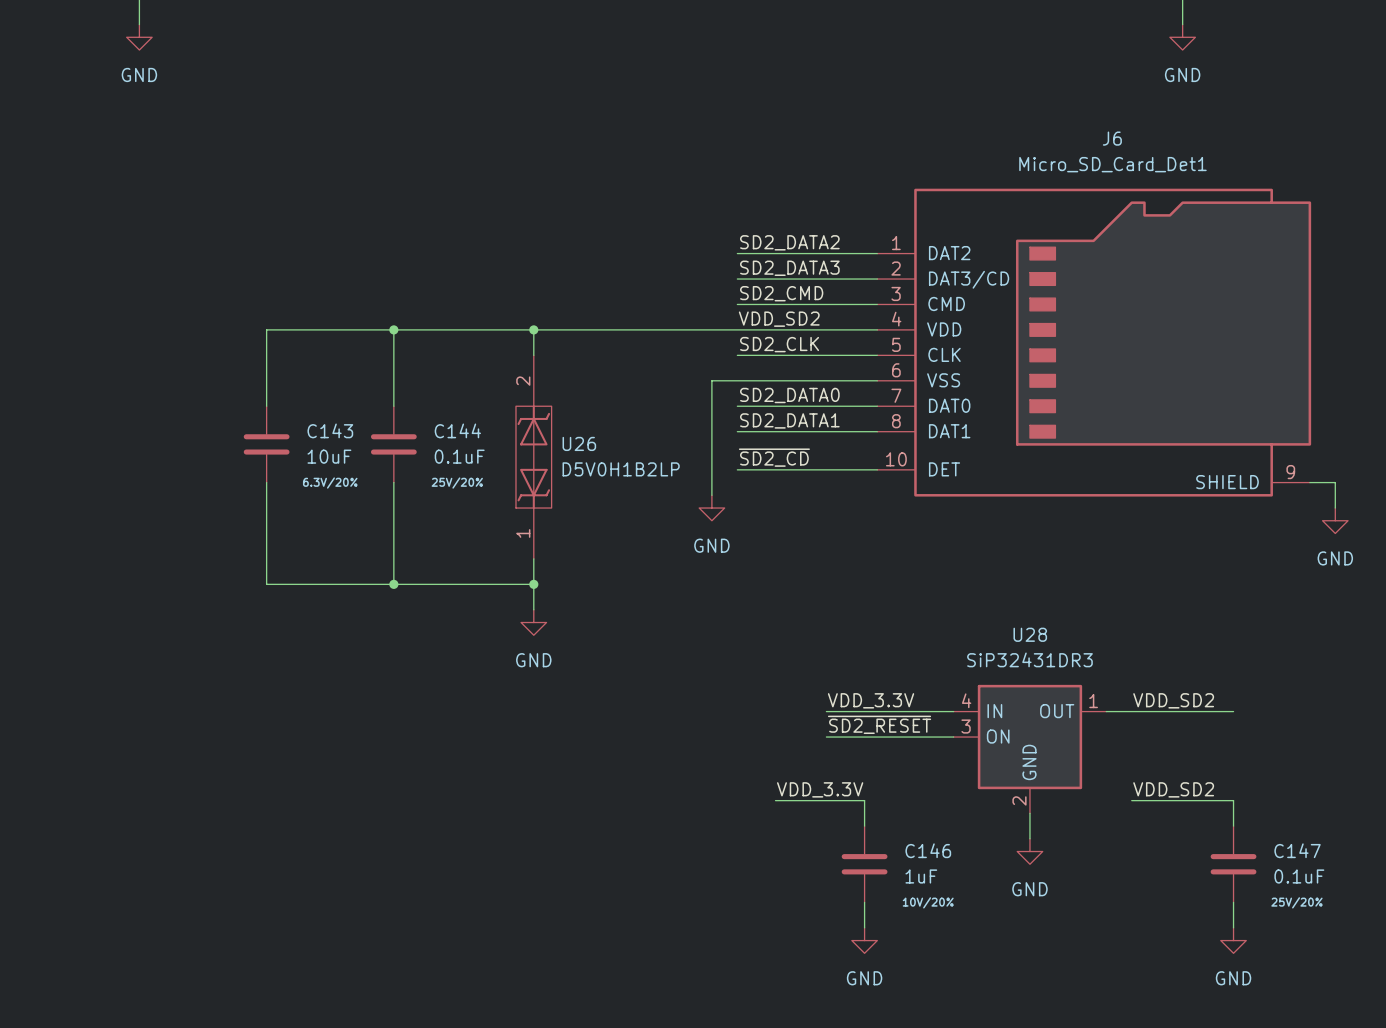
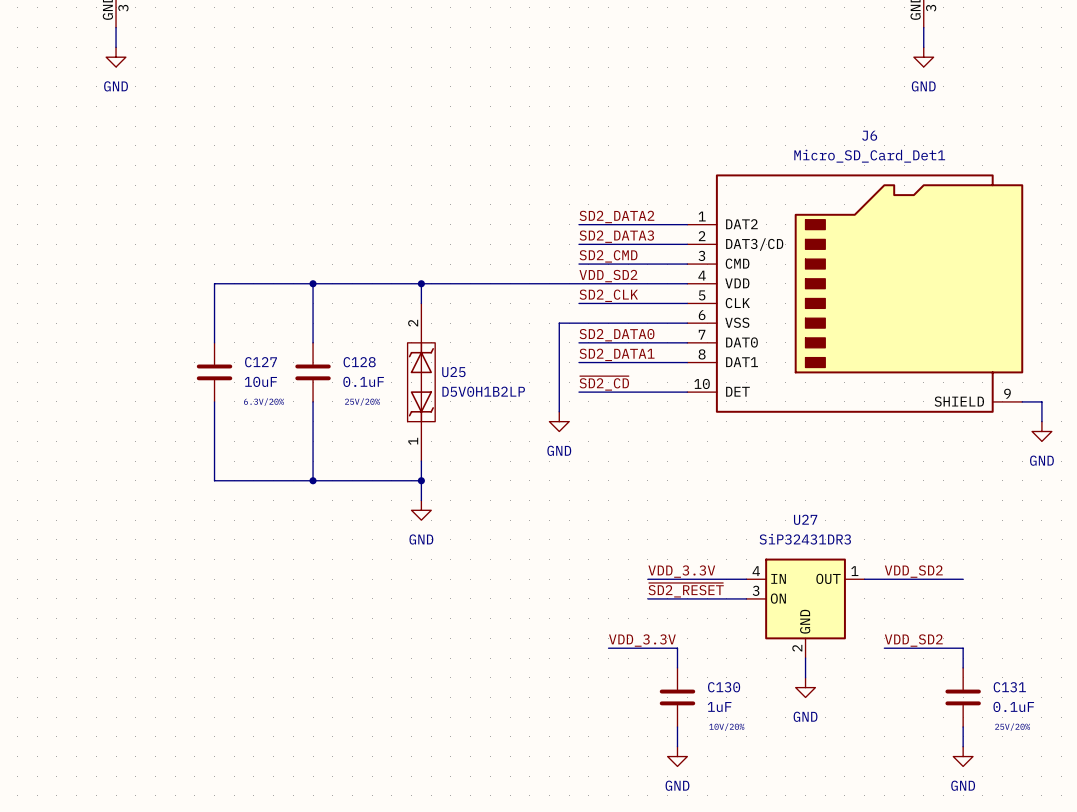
C143 name: C143 (330, 430) -> C127 (261, 362)
C144 name: C144 (457, 430) -> C128 (359, 362)
U26 name: U26 (579, 443) -> U25 (453, 372)
U28 name: U28 (1030, 634) -> U27 (805, 519)
C146 name: C146 (928, 850) -> C130 (724, 687)
C147 name: C147 (1297, 850) -> C131 (1009, 687)

